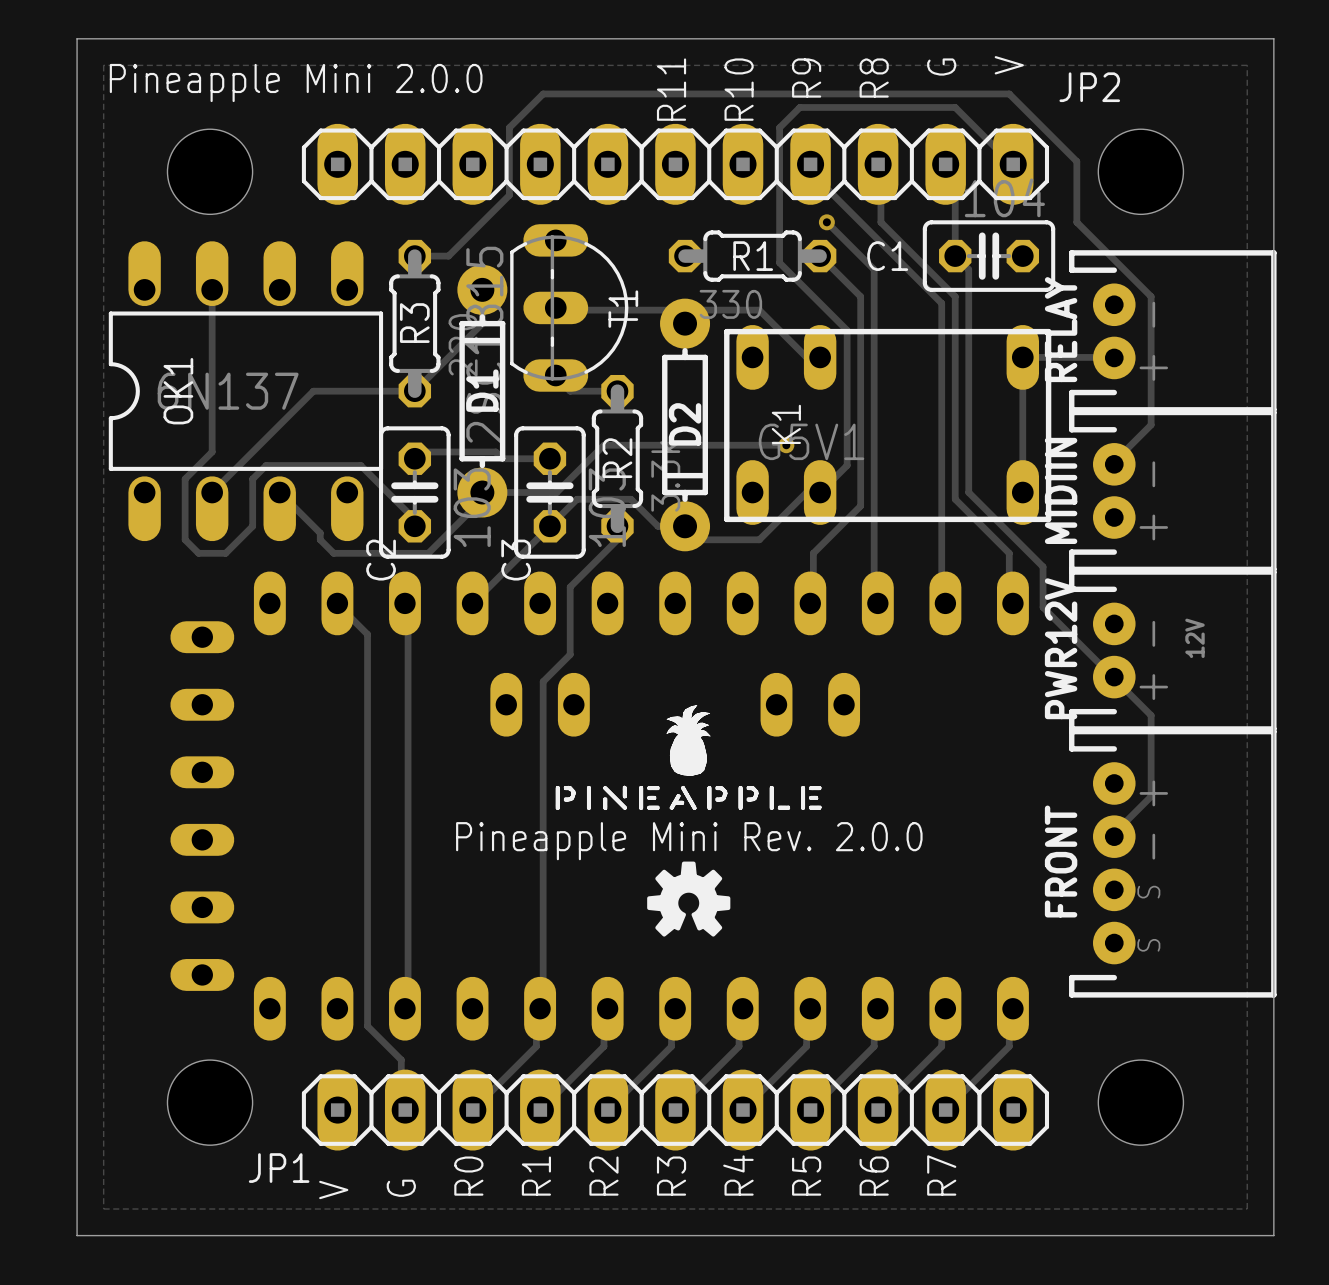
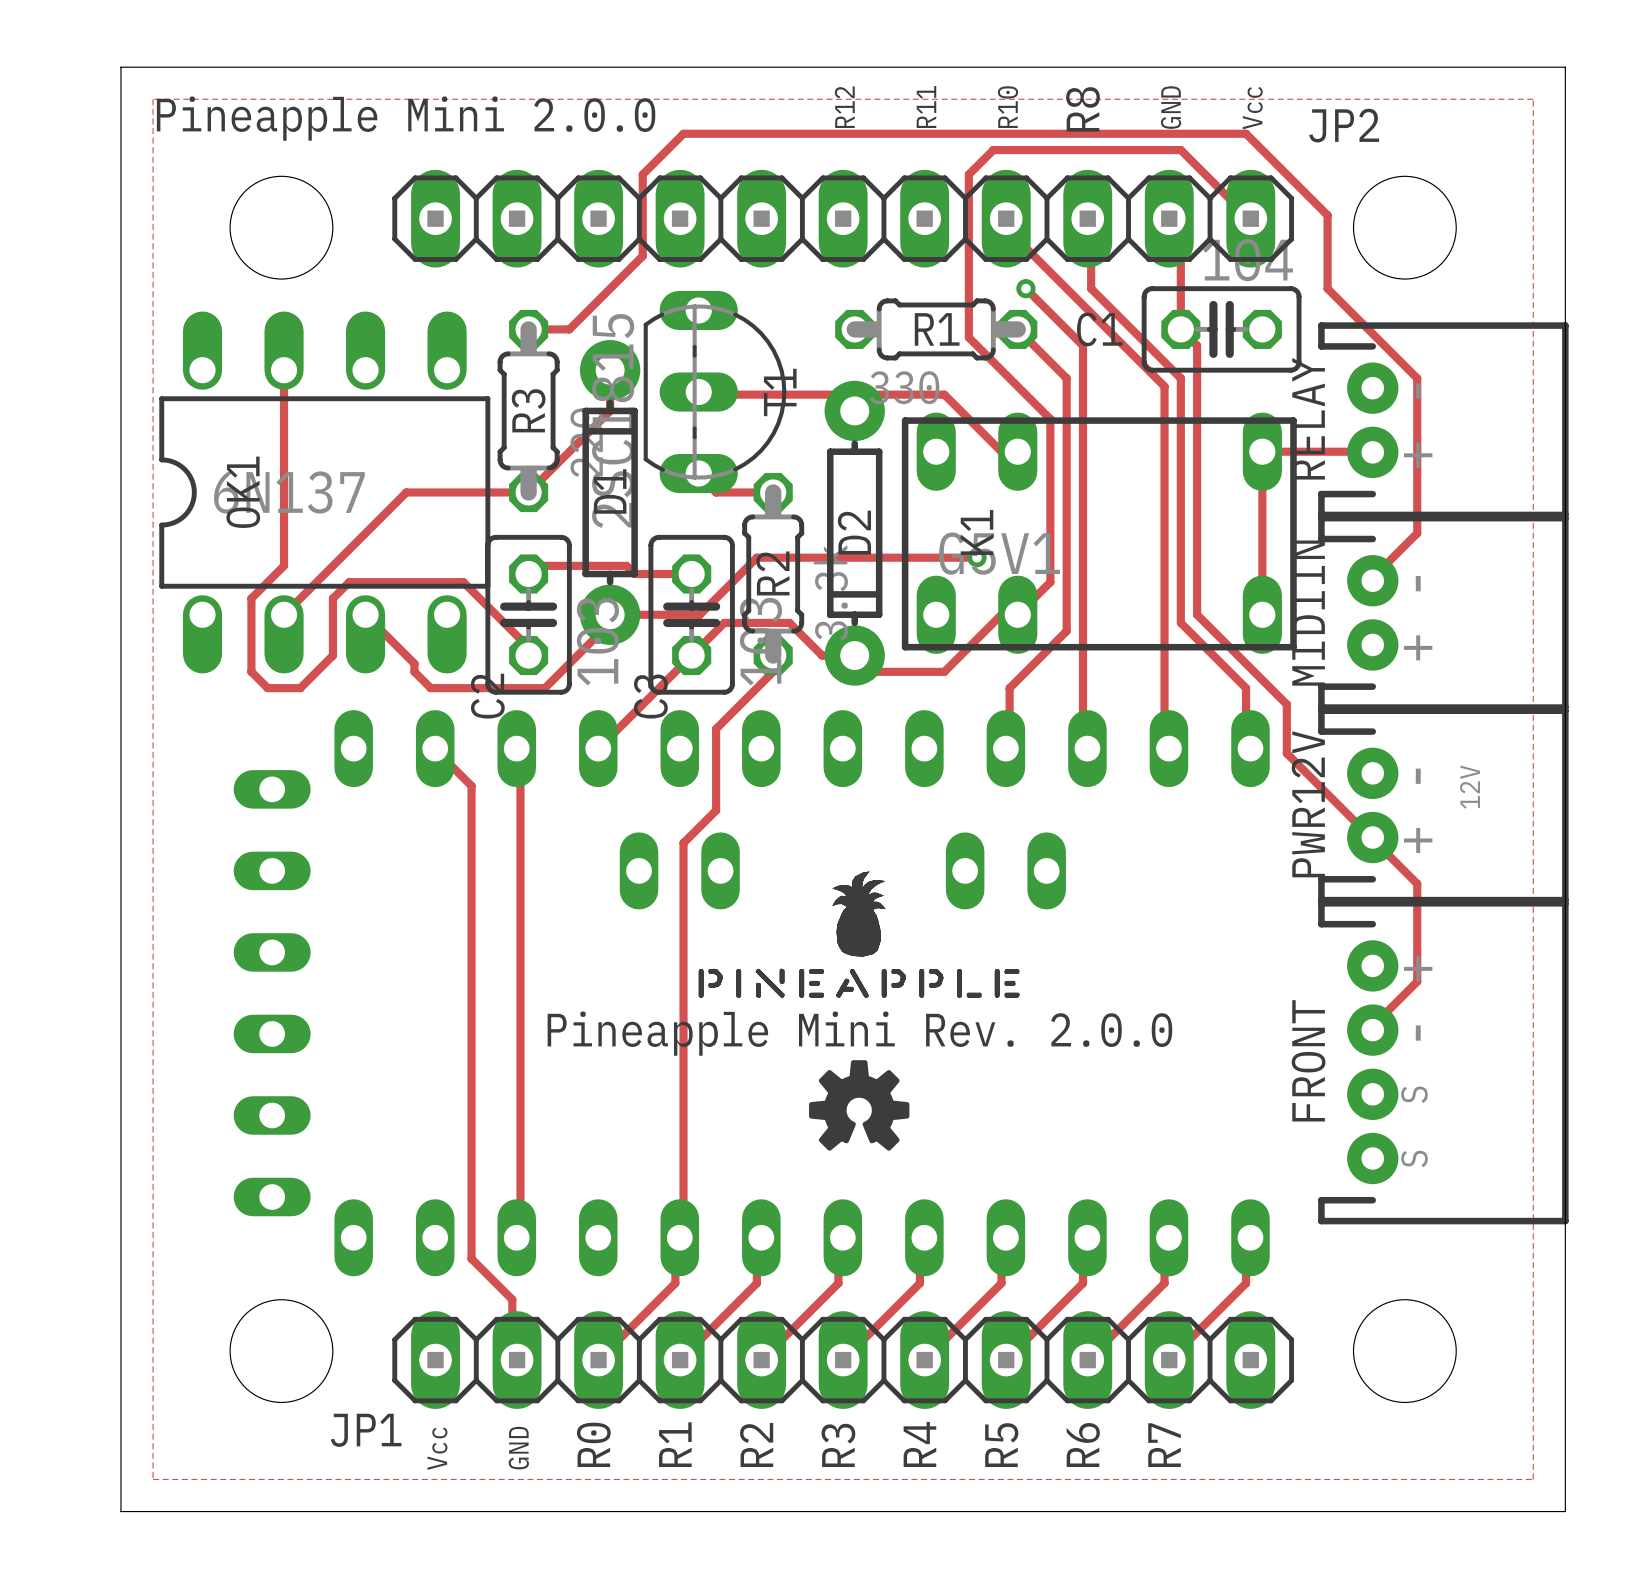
text: V (1009, 65) -> Vcc (1252, 108)
text: G (941, 67) -> GND (1171, 107)
text: R9 (806, 78) -> R10 (1007, 107)
text: R11 (671, 89) -> R12 (844, 107)
text: R10 (739, 89) -> R11 (926, 107)
text: G (401, 1188) -> GND (518, 1448)
text: V (333, 1189) -> Vcc (437, 1448)

